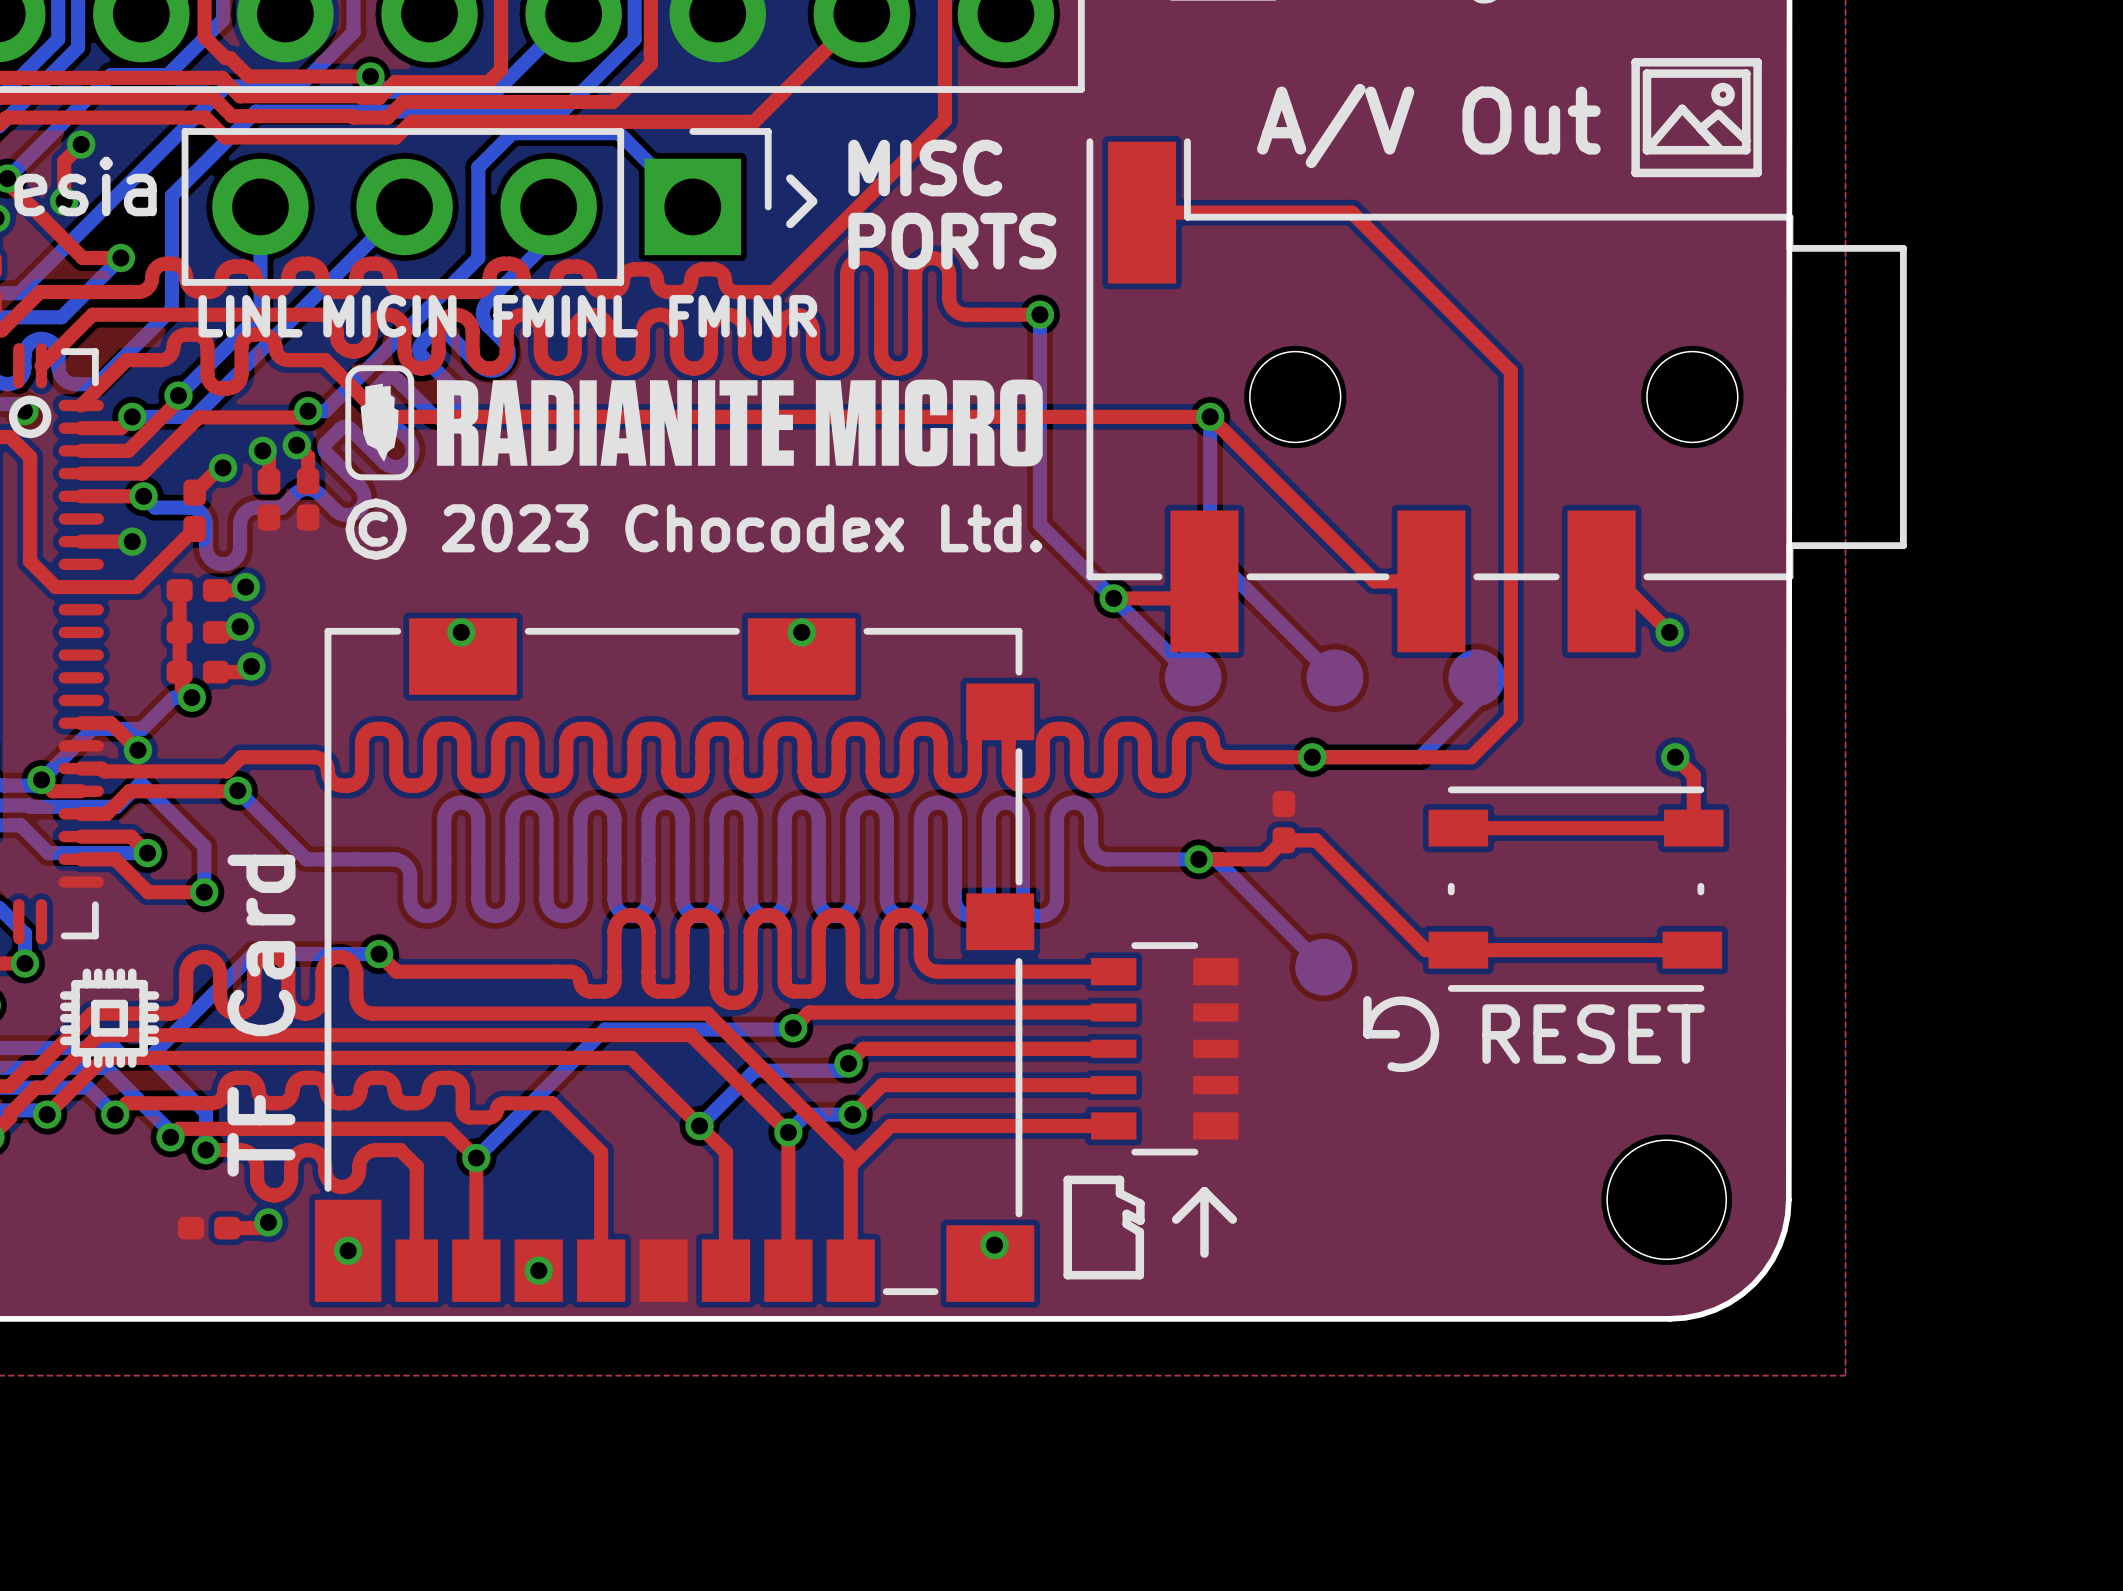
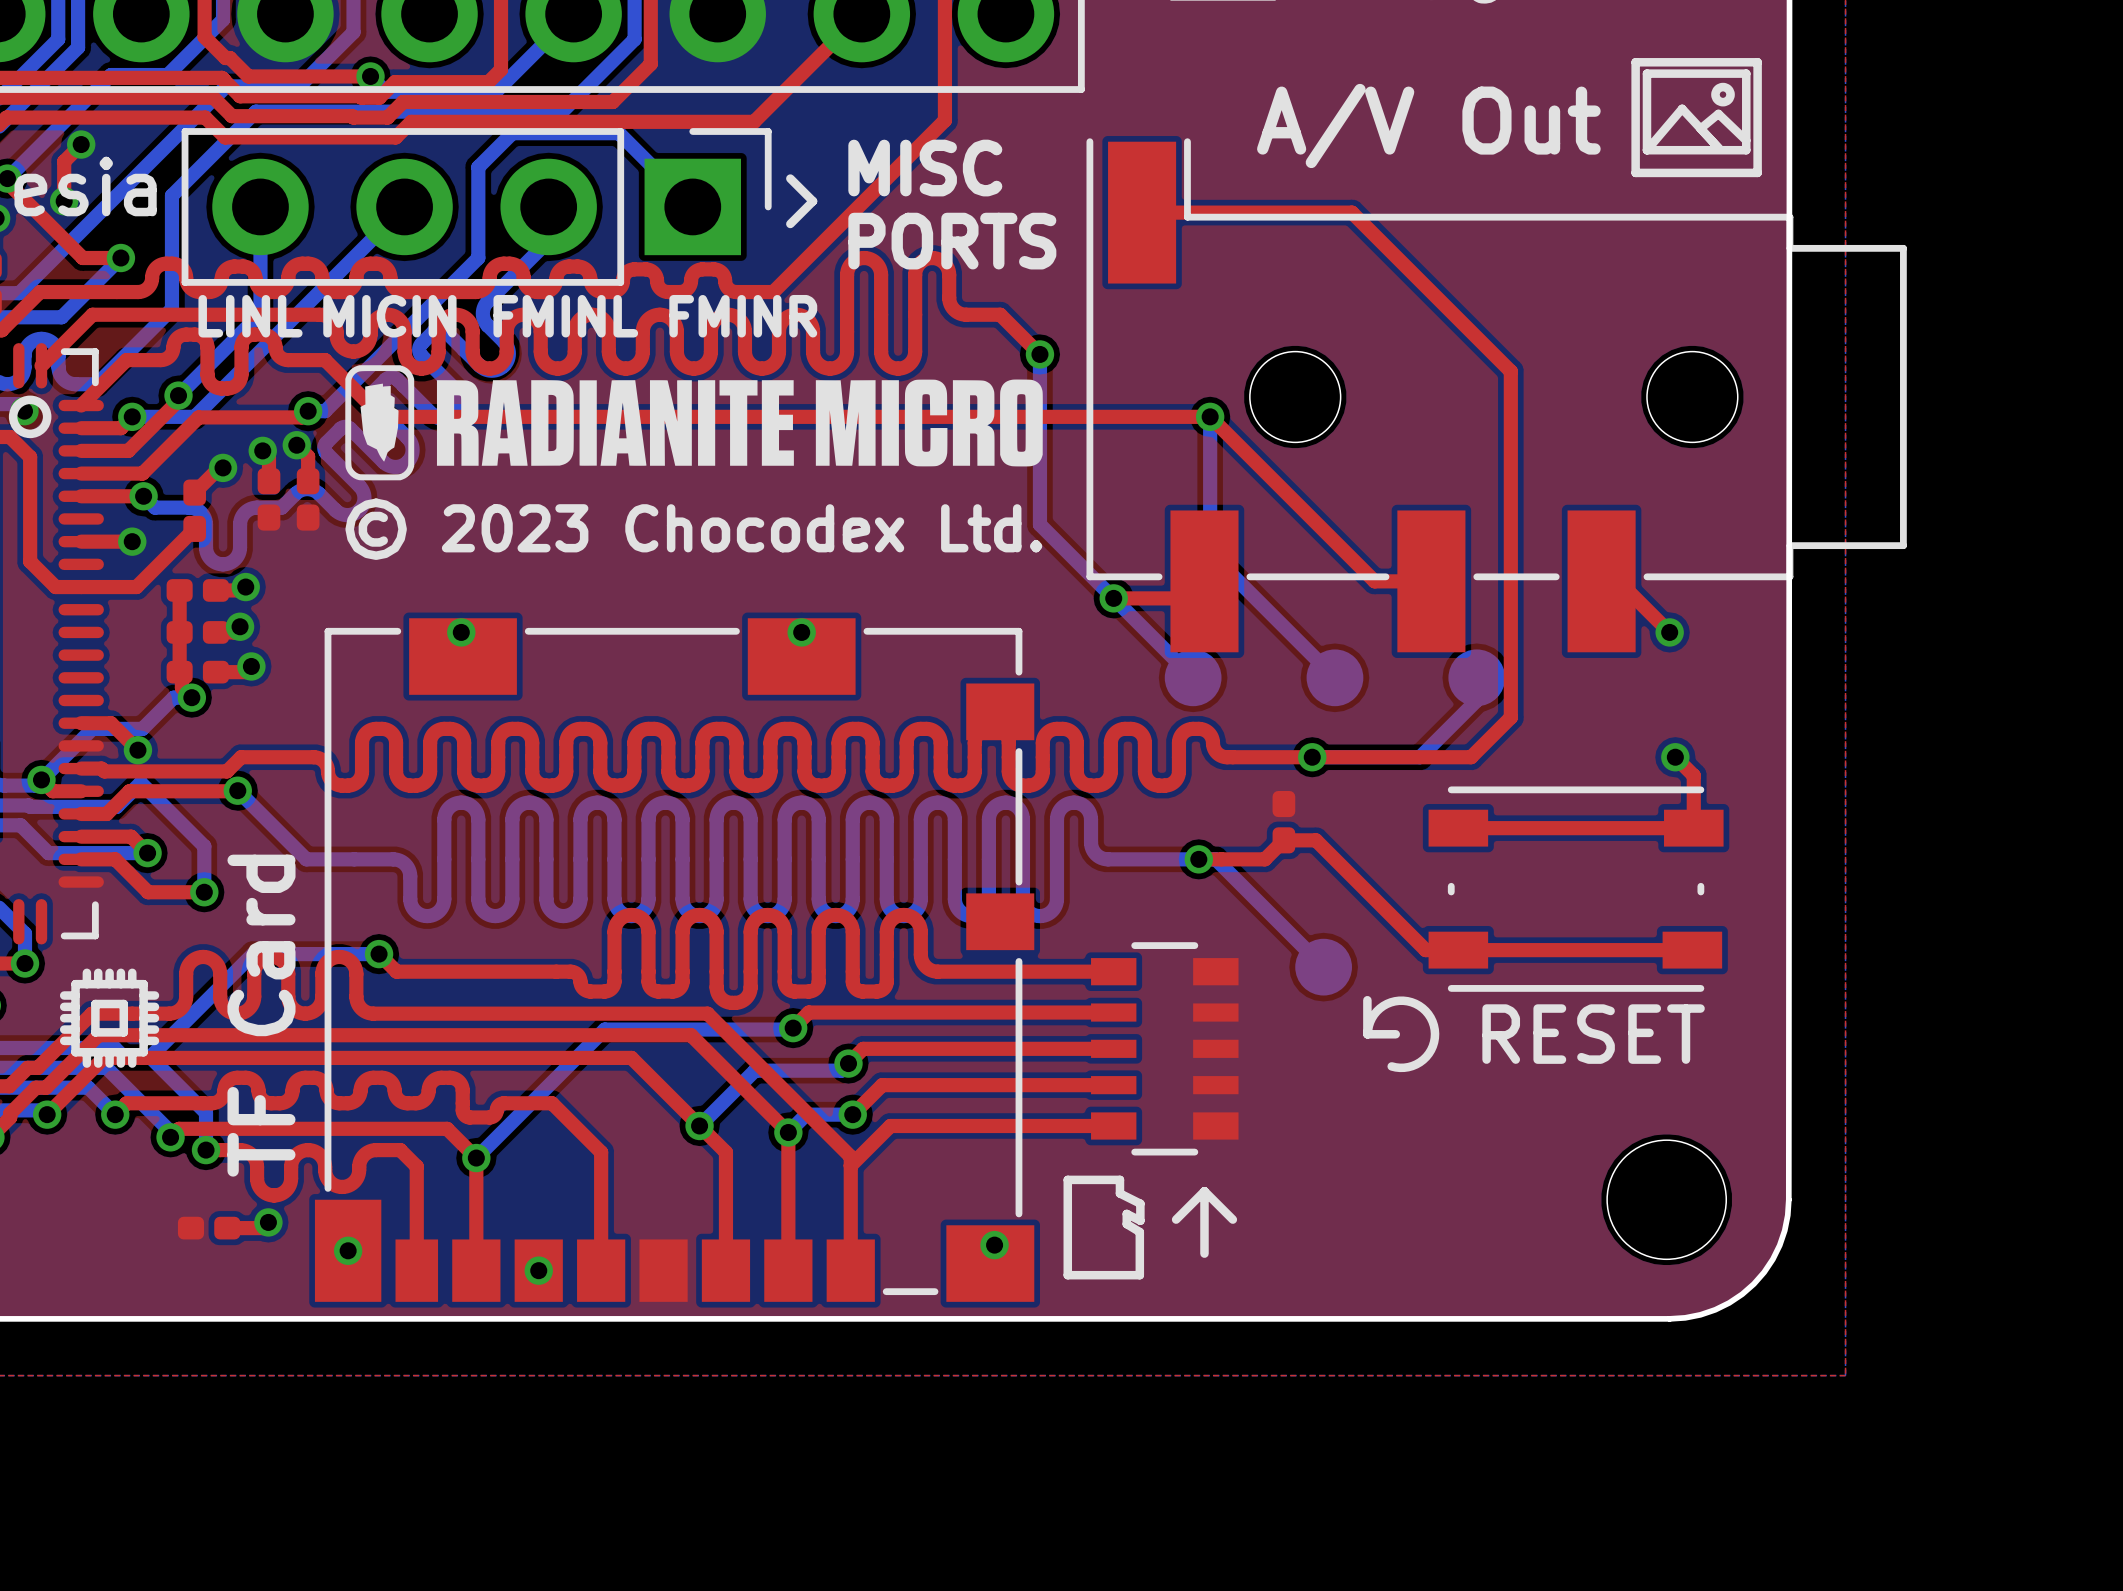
top track: (1000, 314) (1039, 314) -> (1000, 314) (1039, 354)
bottom track: (1039, 314) (1039, 354) -> none
via position: (1039, 314) -> (1039, 354)

